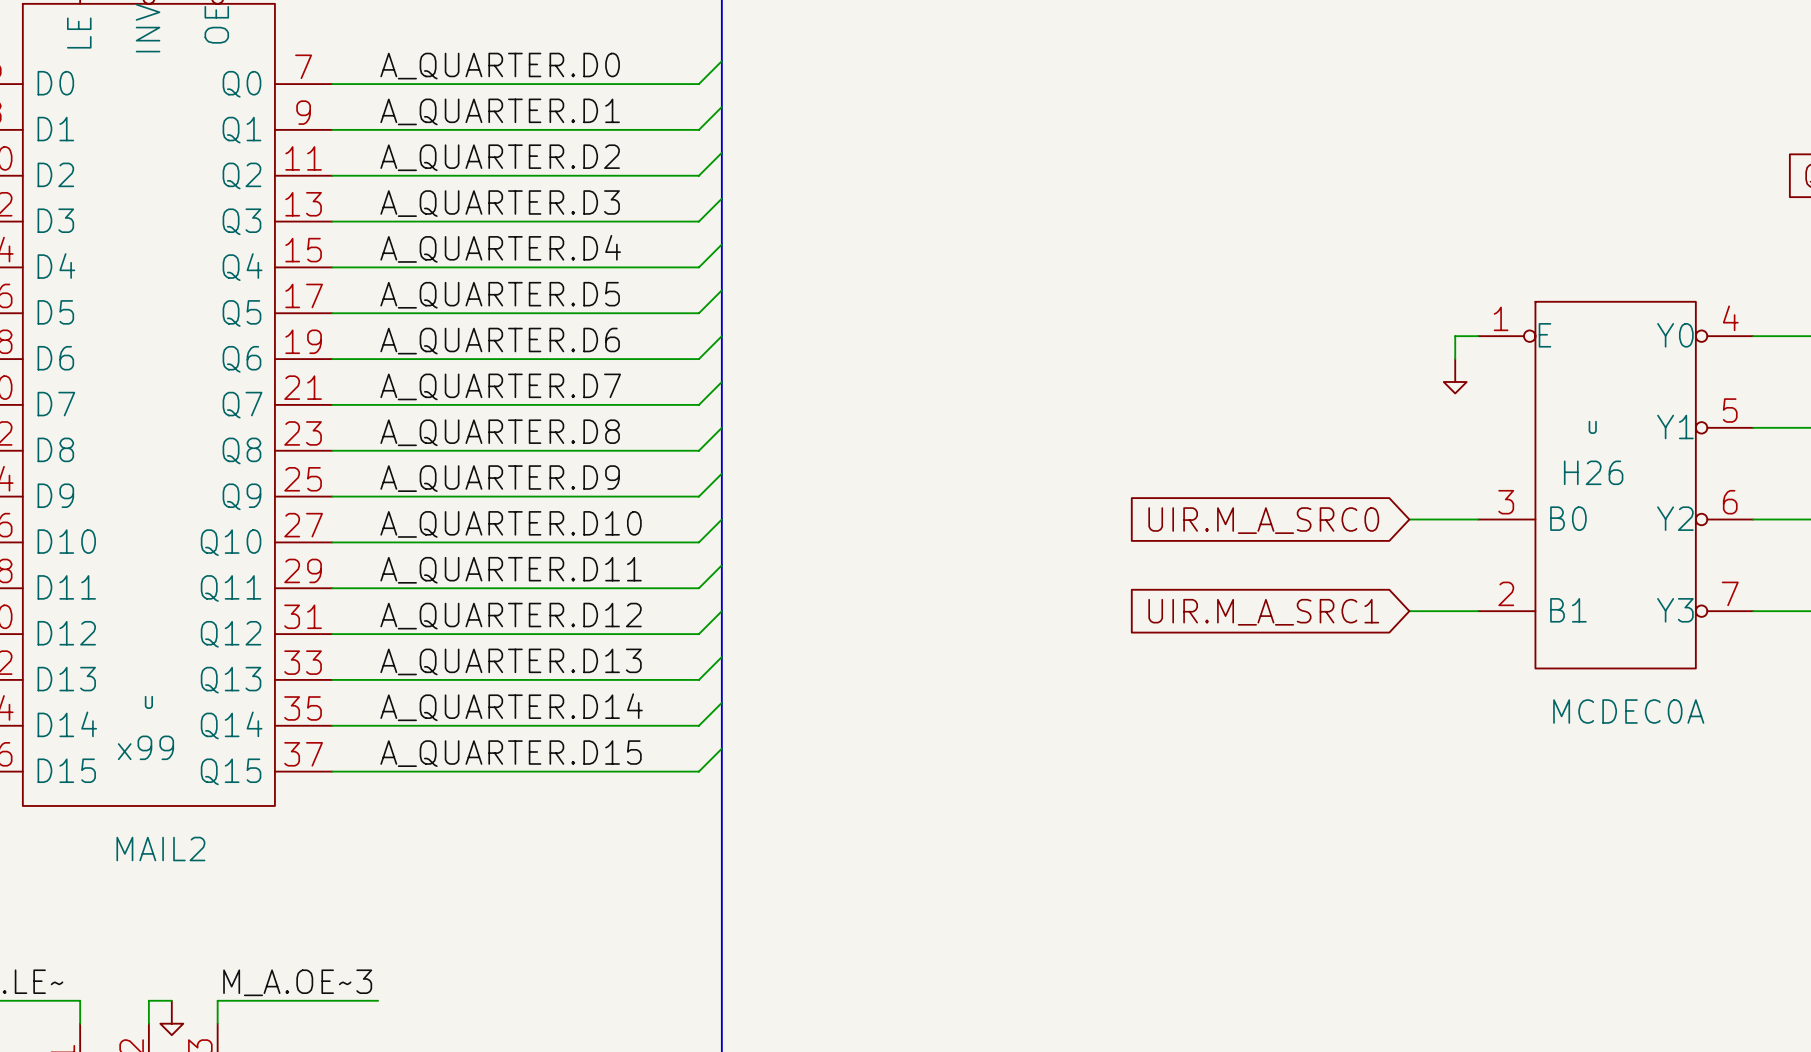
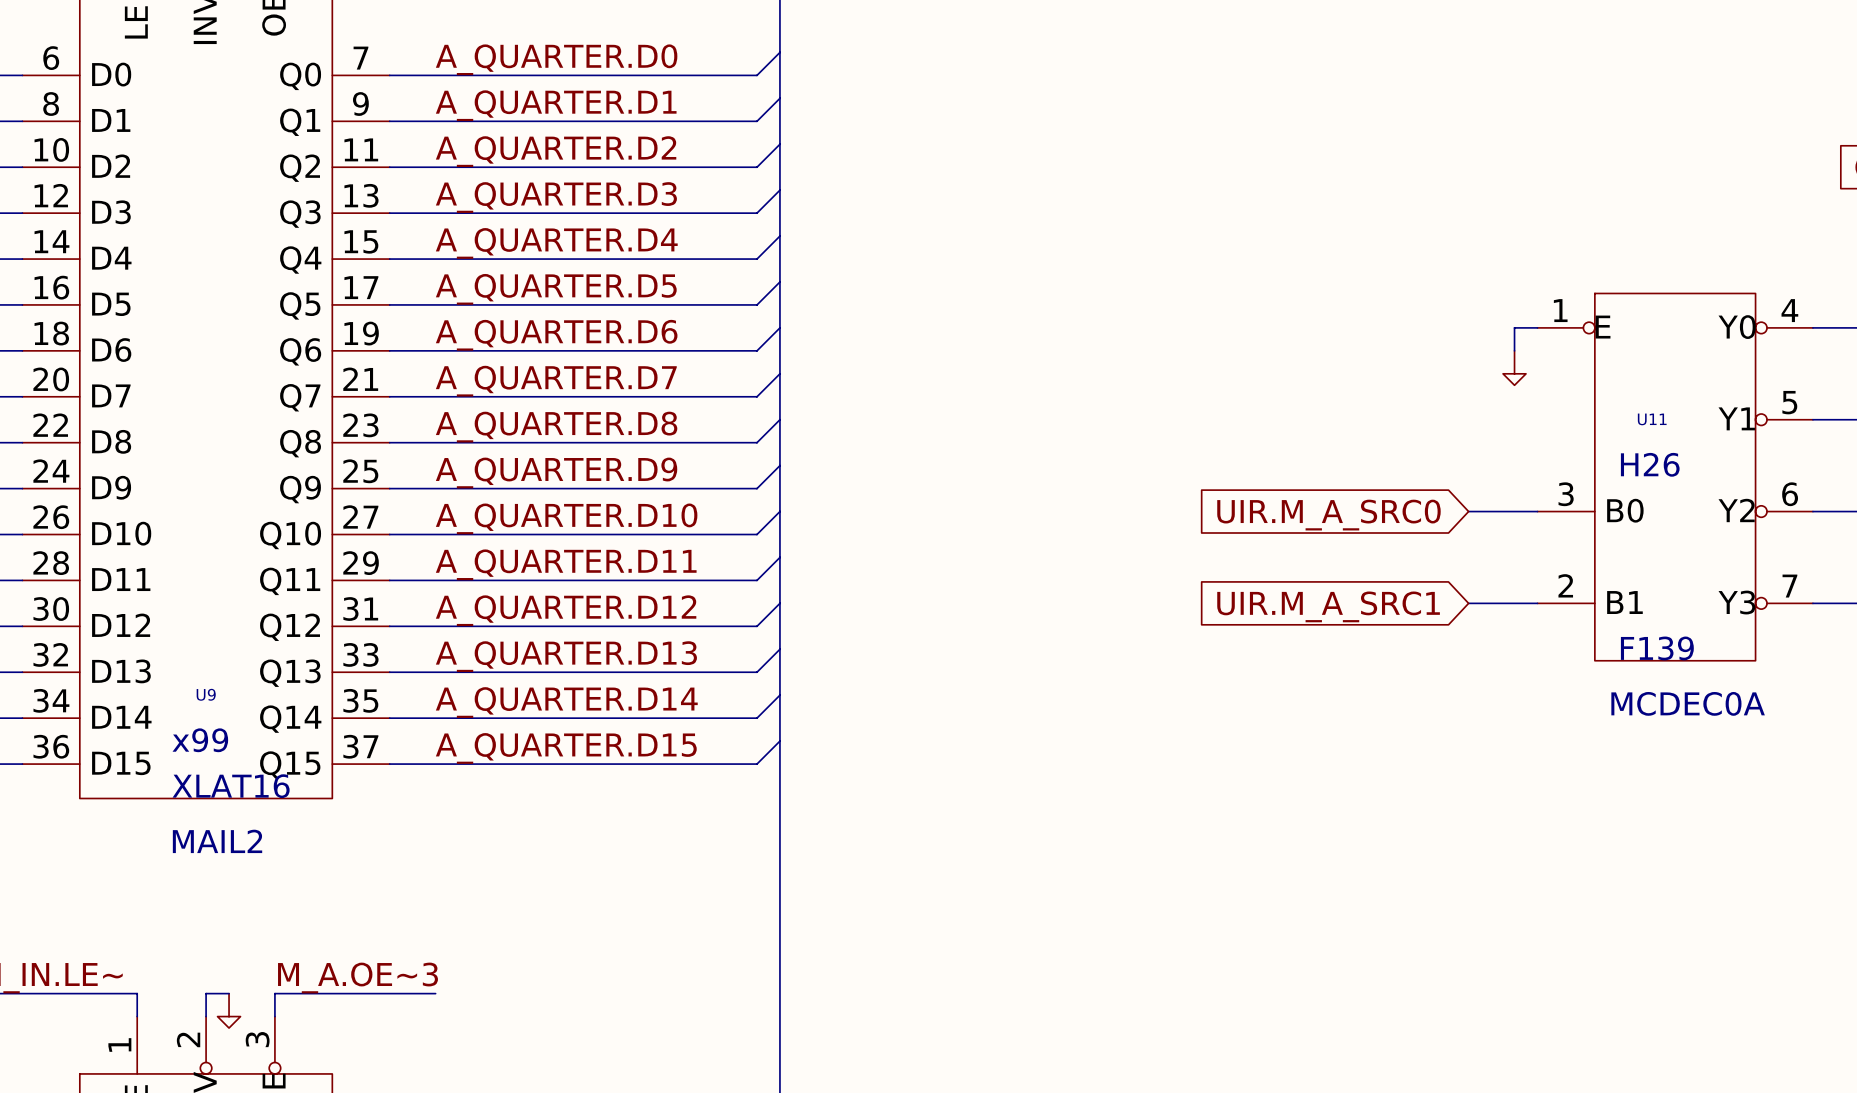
U name: U (1592, 427) -> U11 (1652, 419)
U value: none -> F139 (1657, 648)
U name: U (148, 702) -> U9 (206, 694)
U value: none -> XLAT16 (231, 786)

